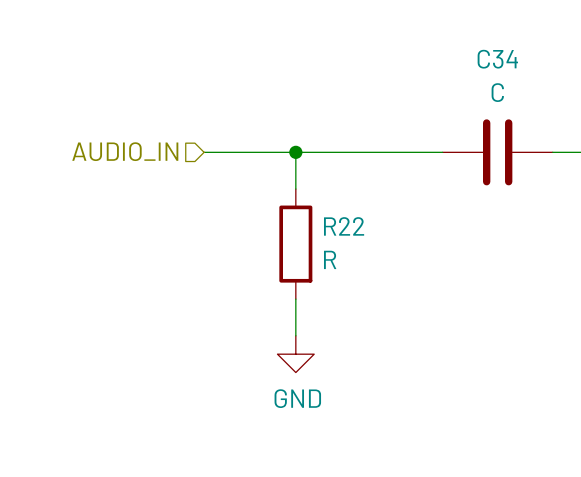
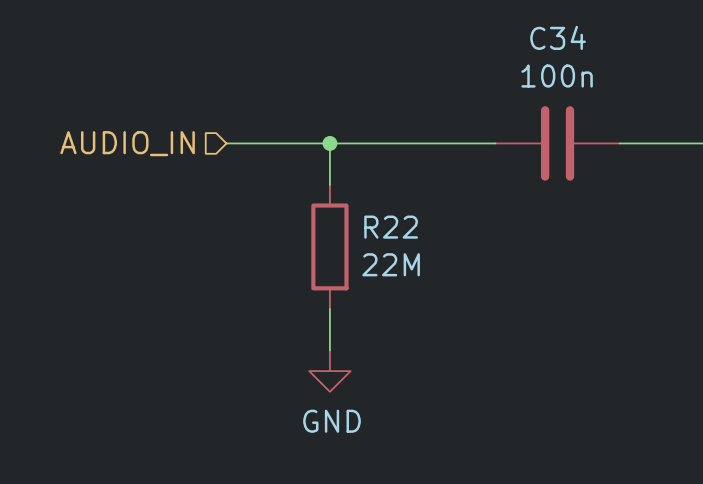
C34 value: C (497, 92) -> 100n (557, 76)
R22 value: R (330, 259) -> 22M (391, 264)

